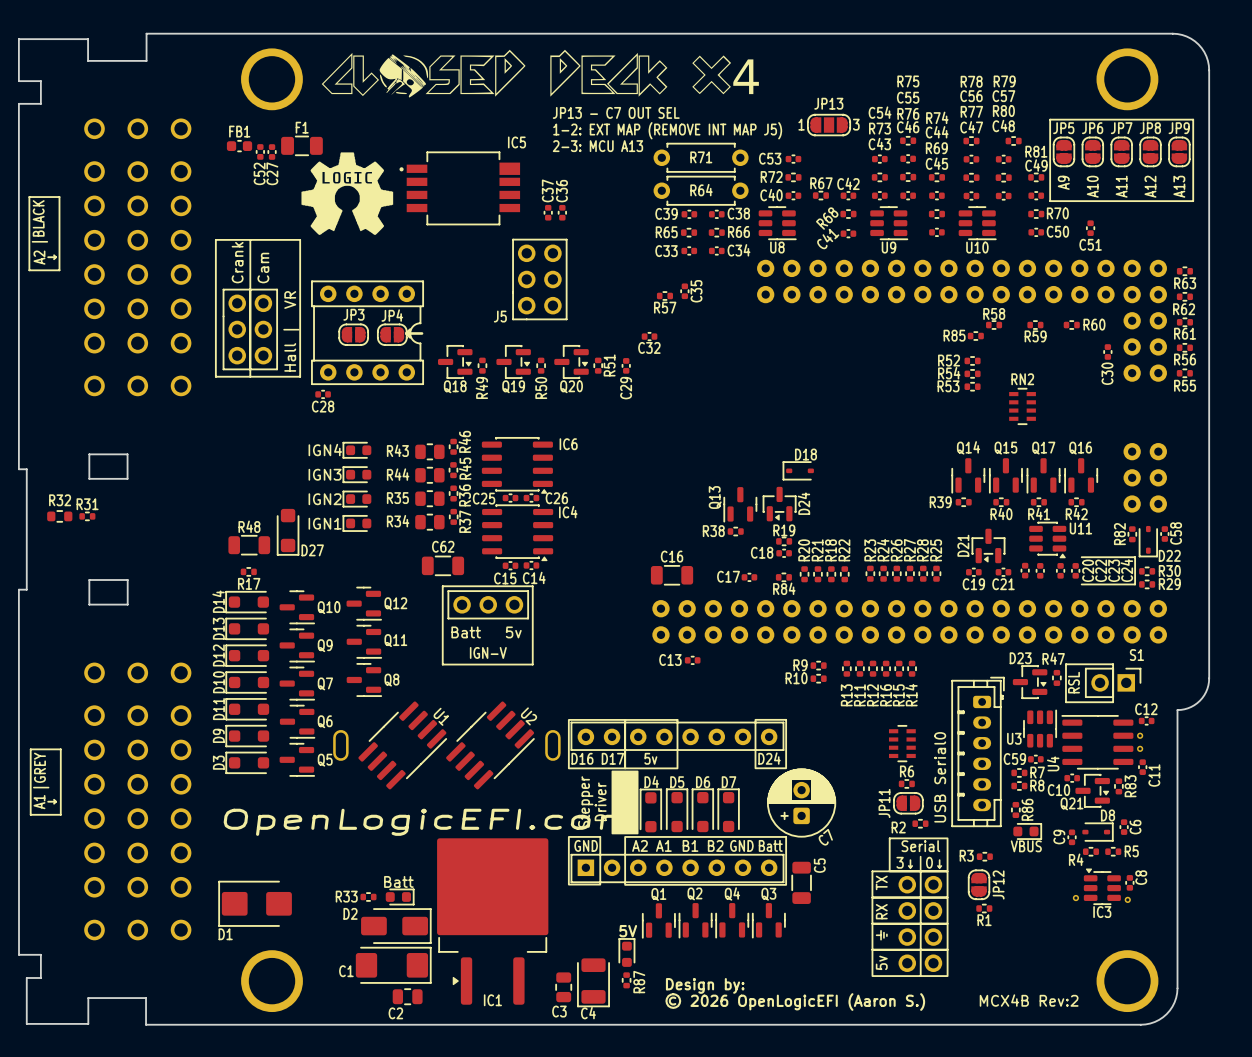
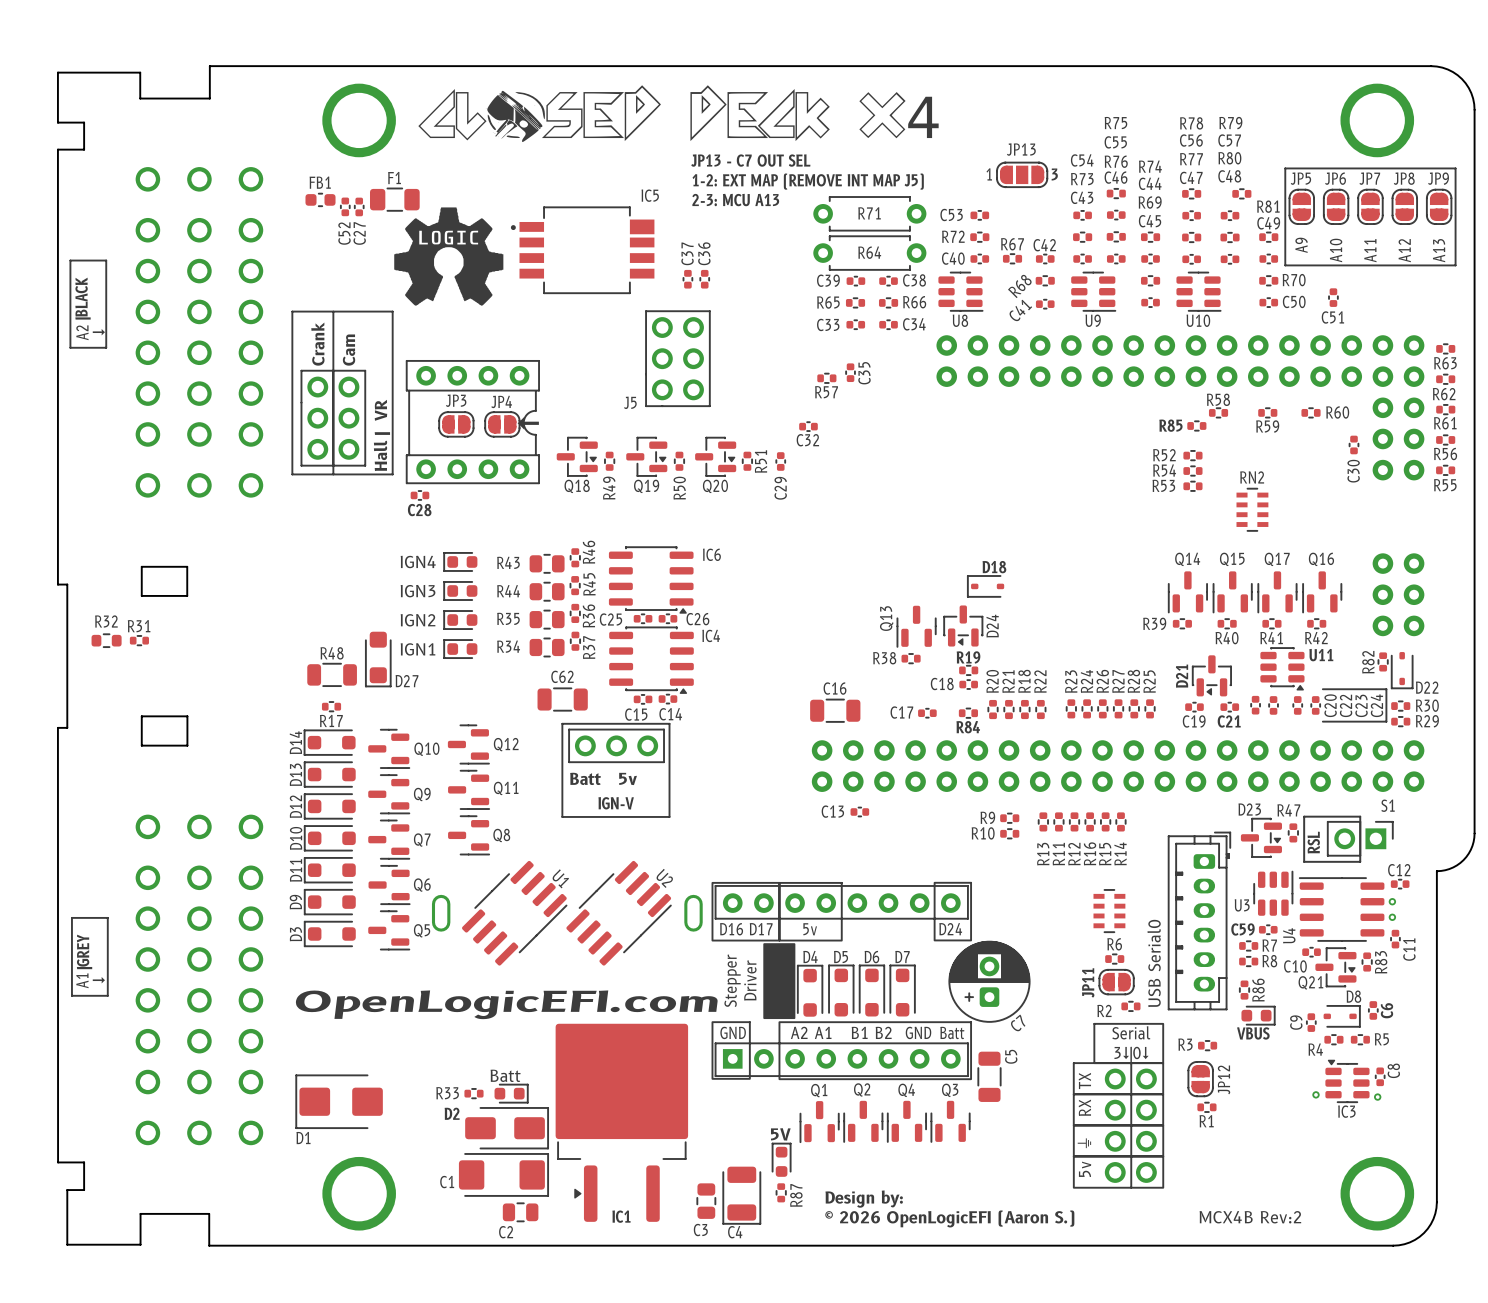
C58: (1164, 534) -> none

